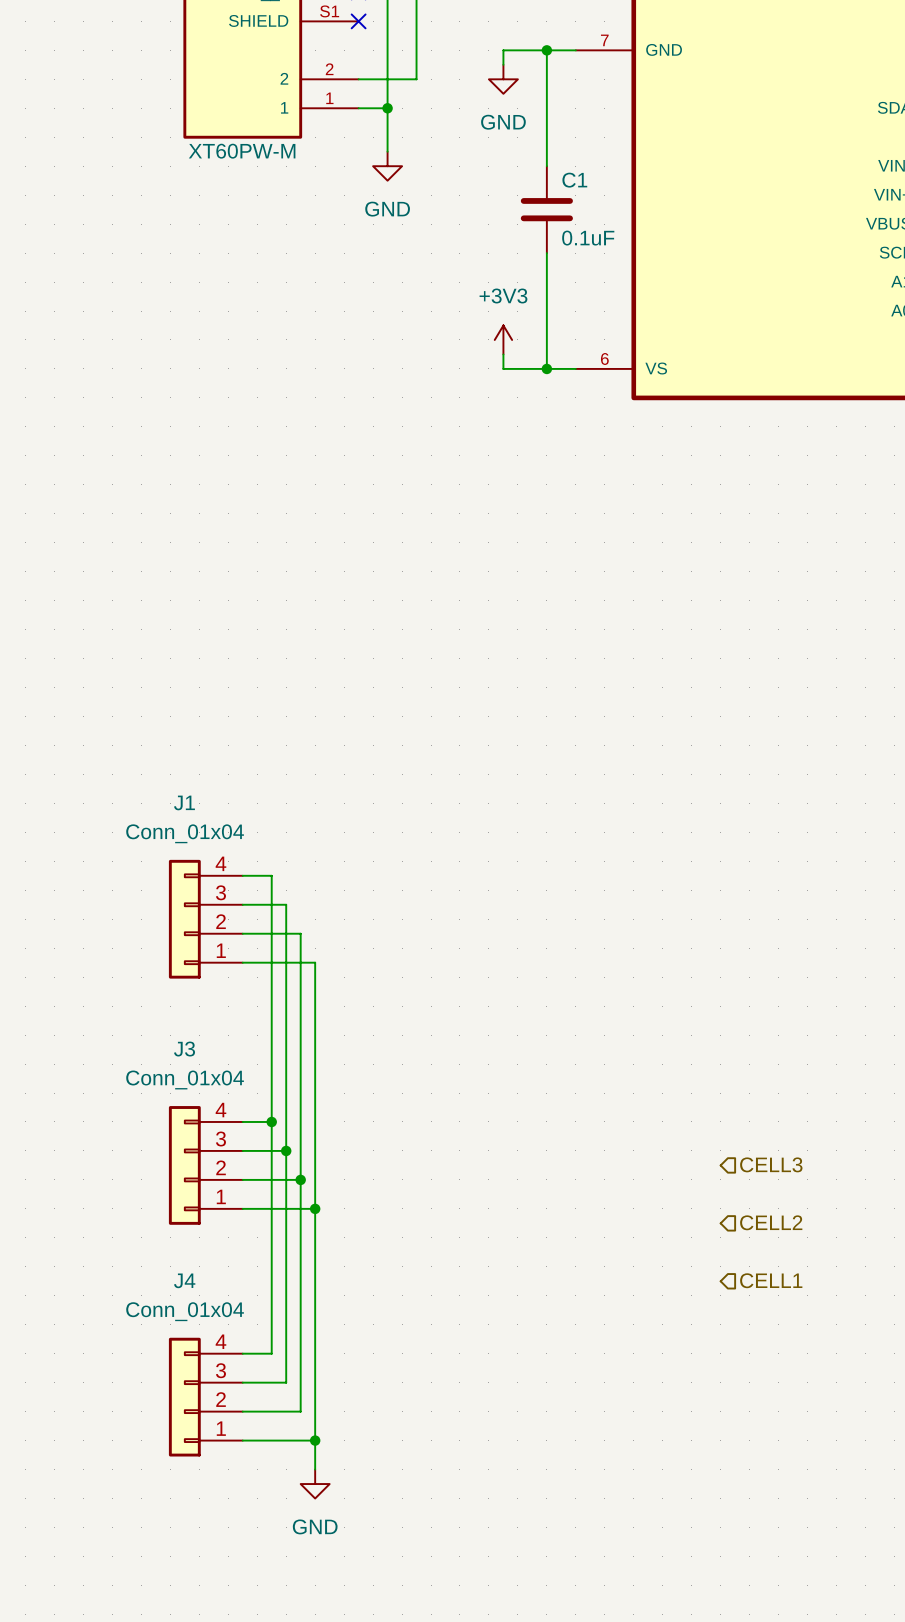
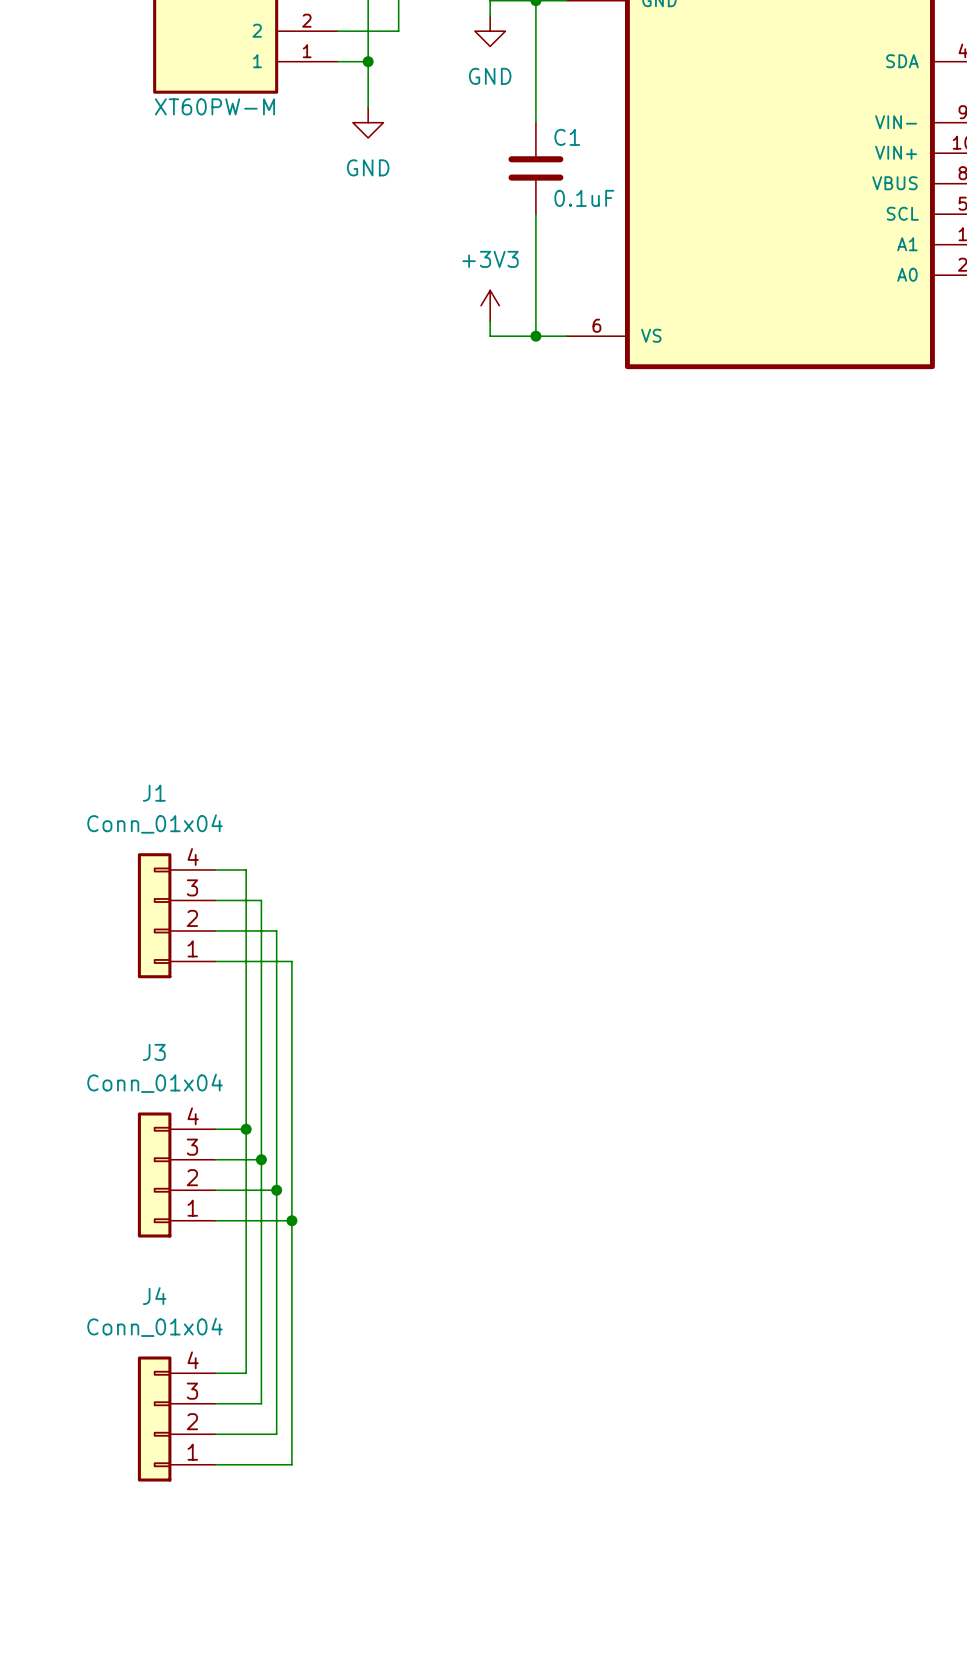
hierarchical label: CELL3 (771, 1164) -> none
hierarchical label: CELL2 (771, 1222) -> none
hierarchical label: CELL1 (771, 1280) -> none
wire: (315, 1440) (315, 1469) -> none
junction: (315, 1440) -> none
power symbol: GND (315, 1484) -> none

